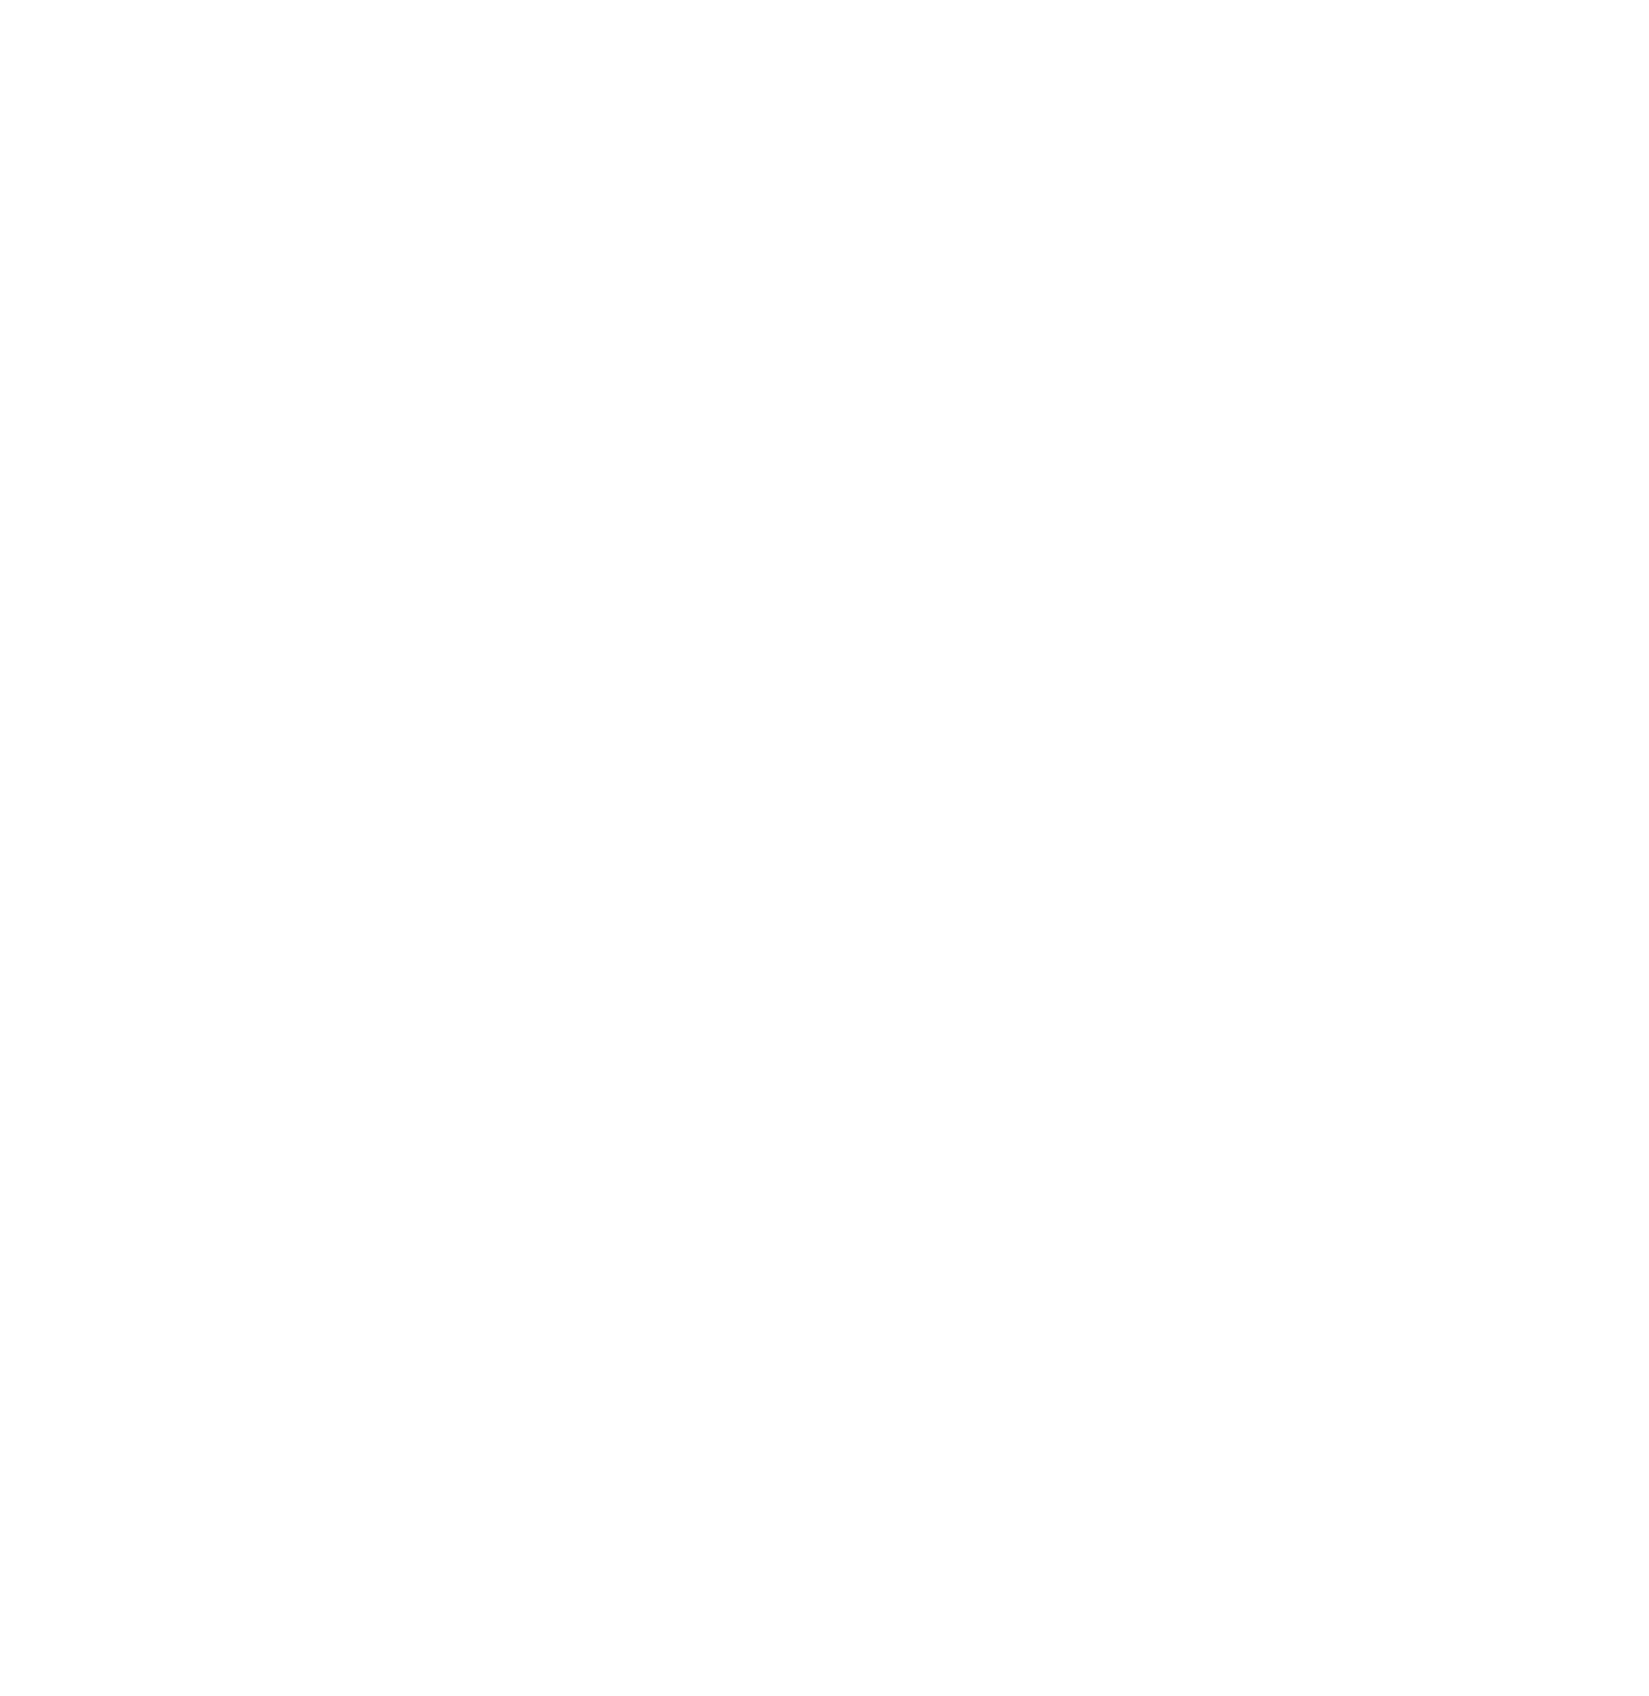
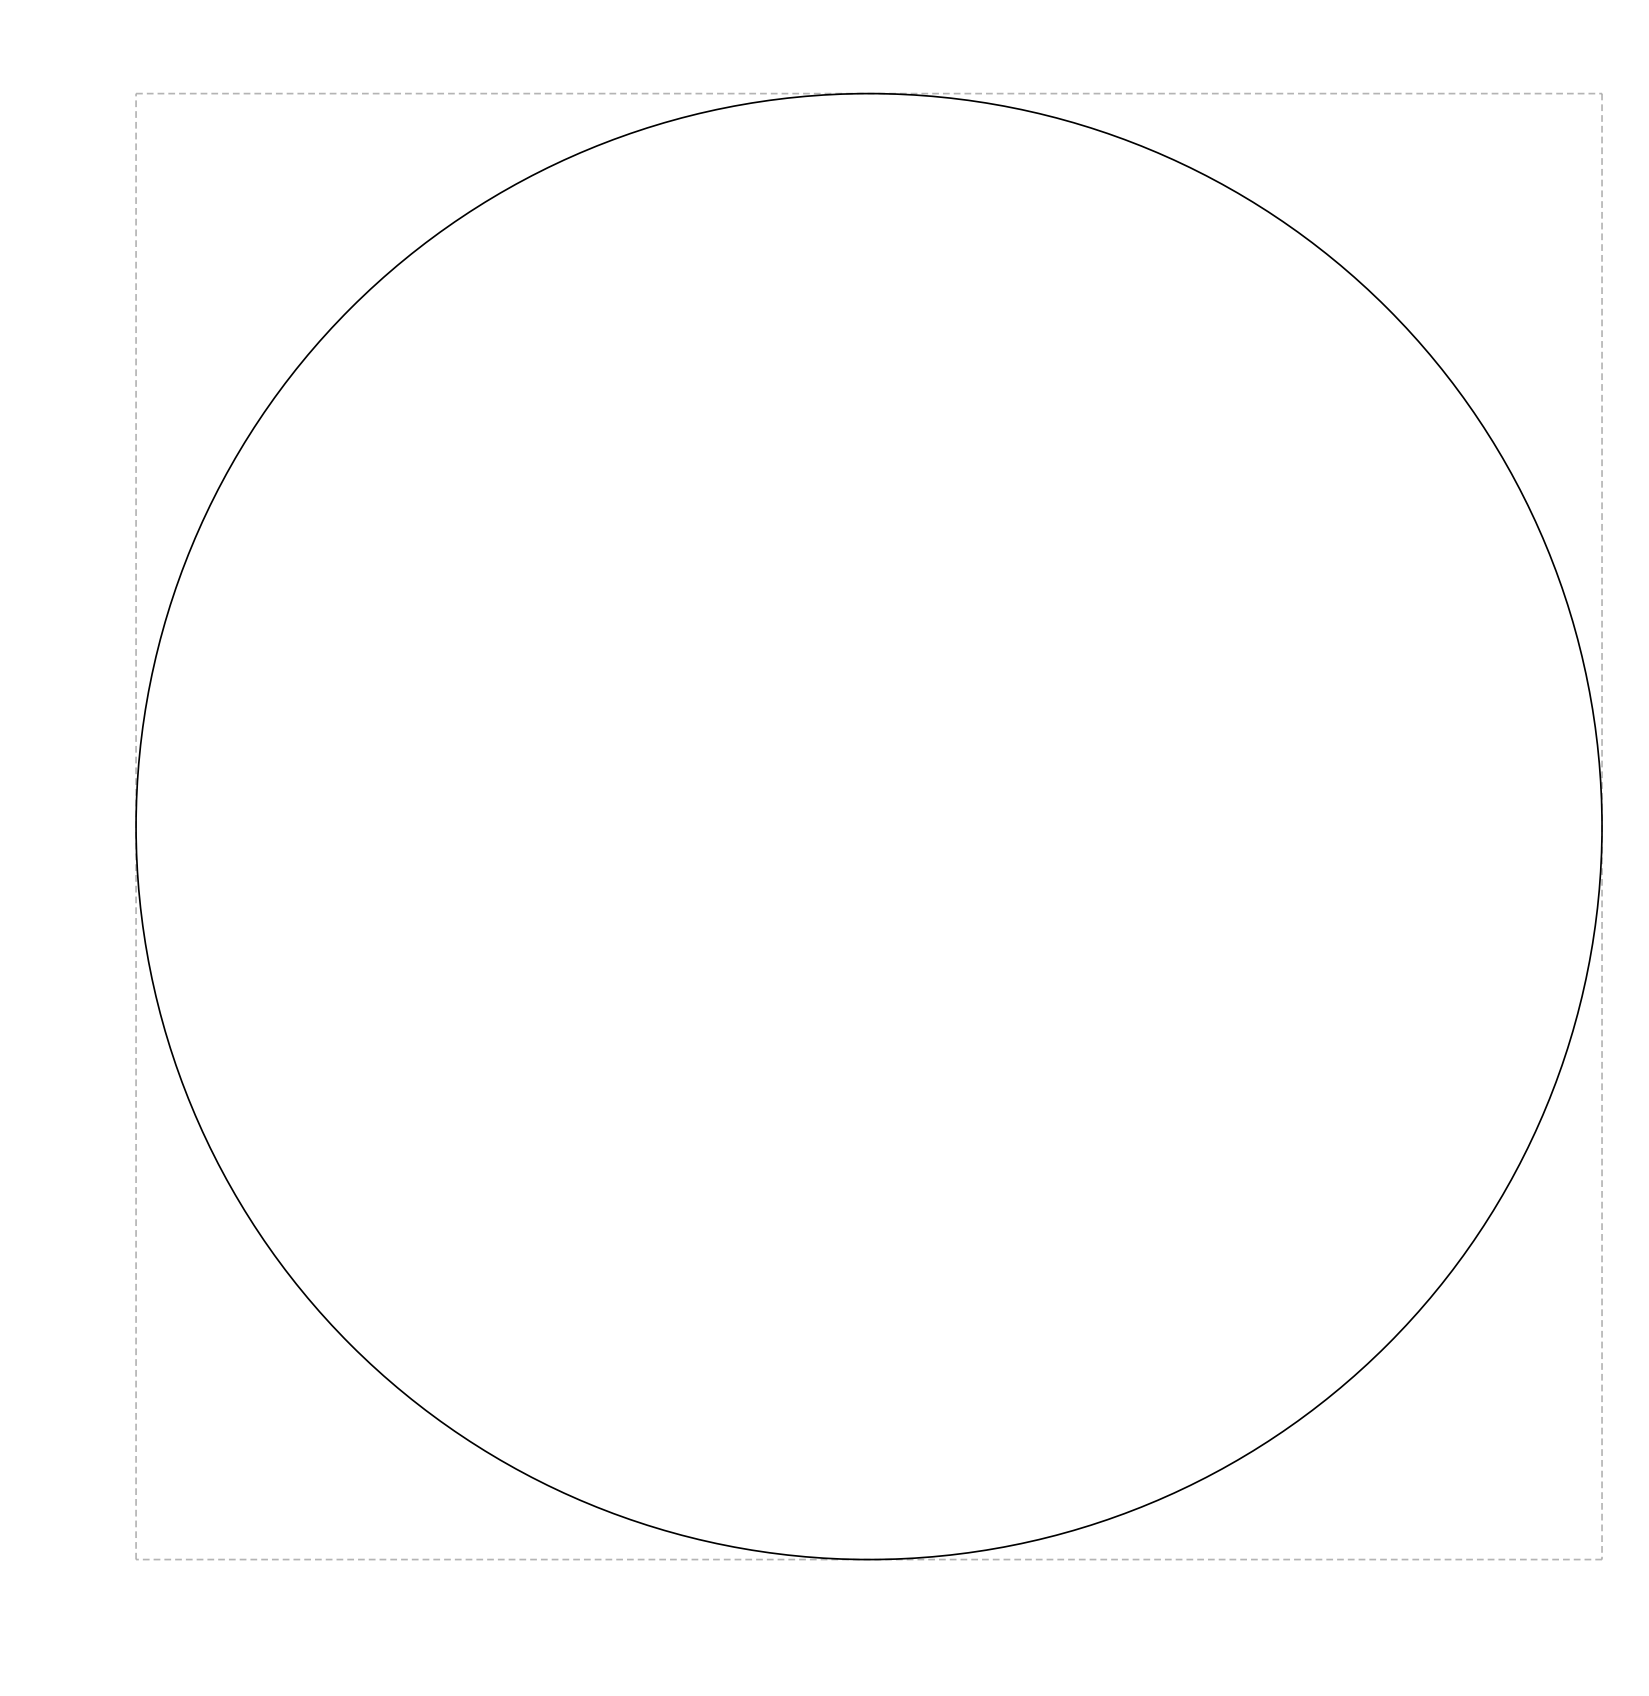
round board edge: none -> [135, 92, 1603, 1561]
zone outline: none -> (1602, 93) (1602, 1559) (136, 1559) (136, 93) (1602, 93)

